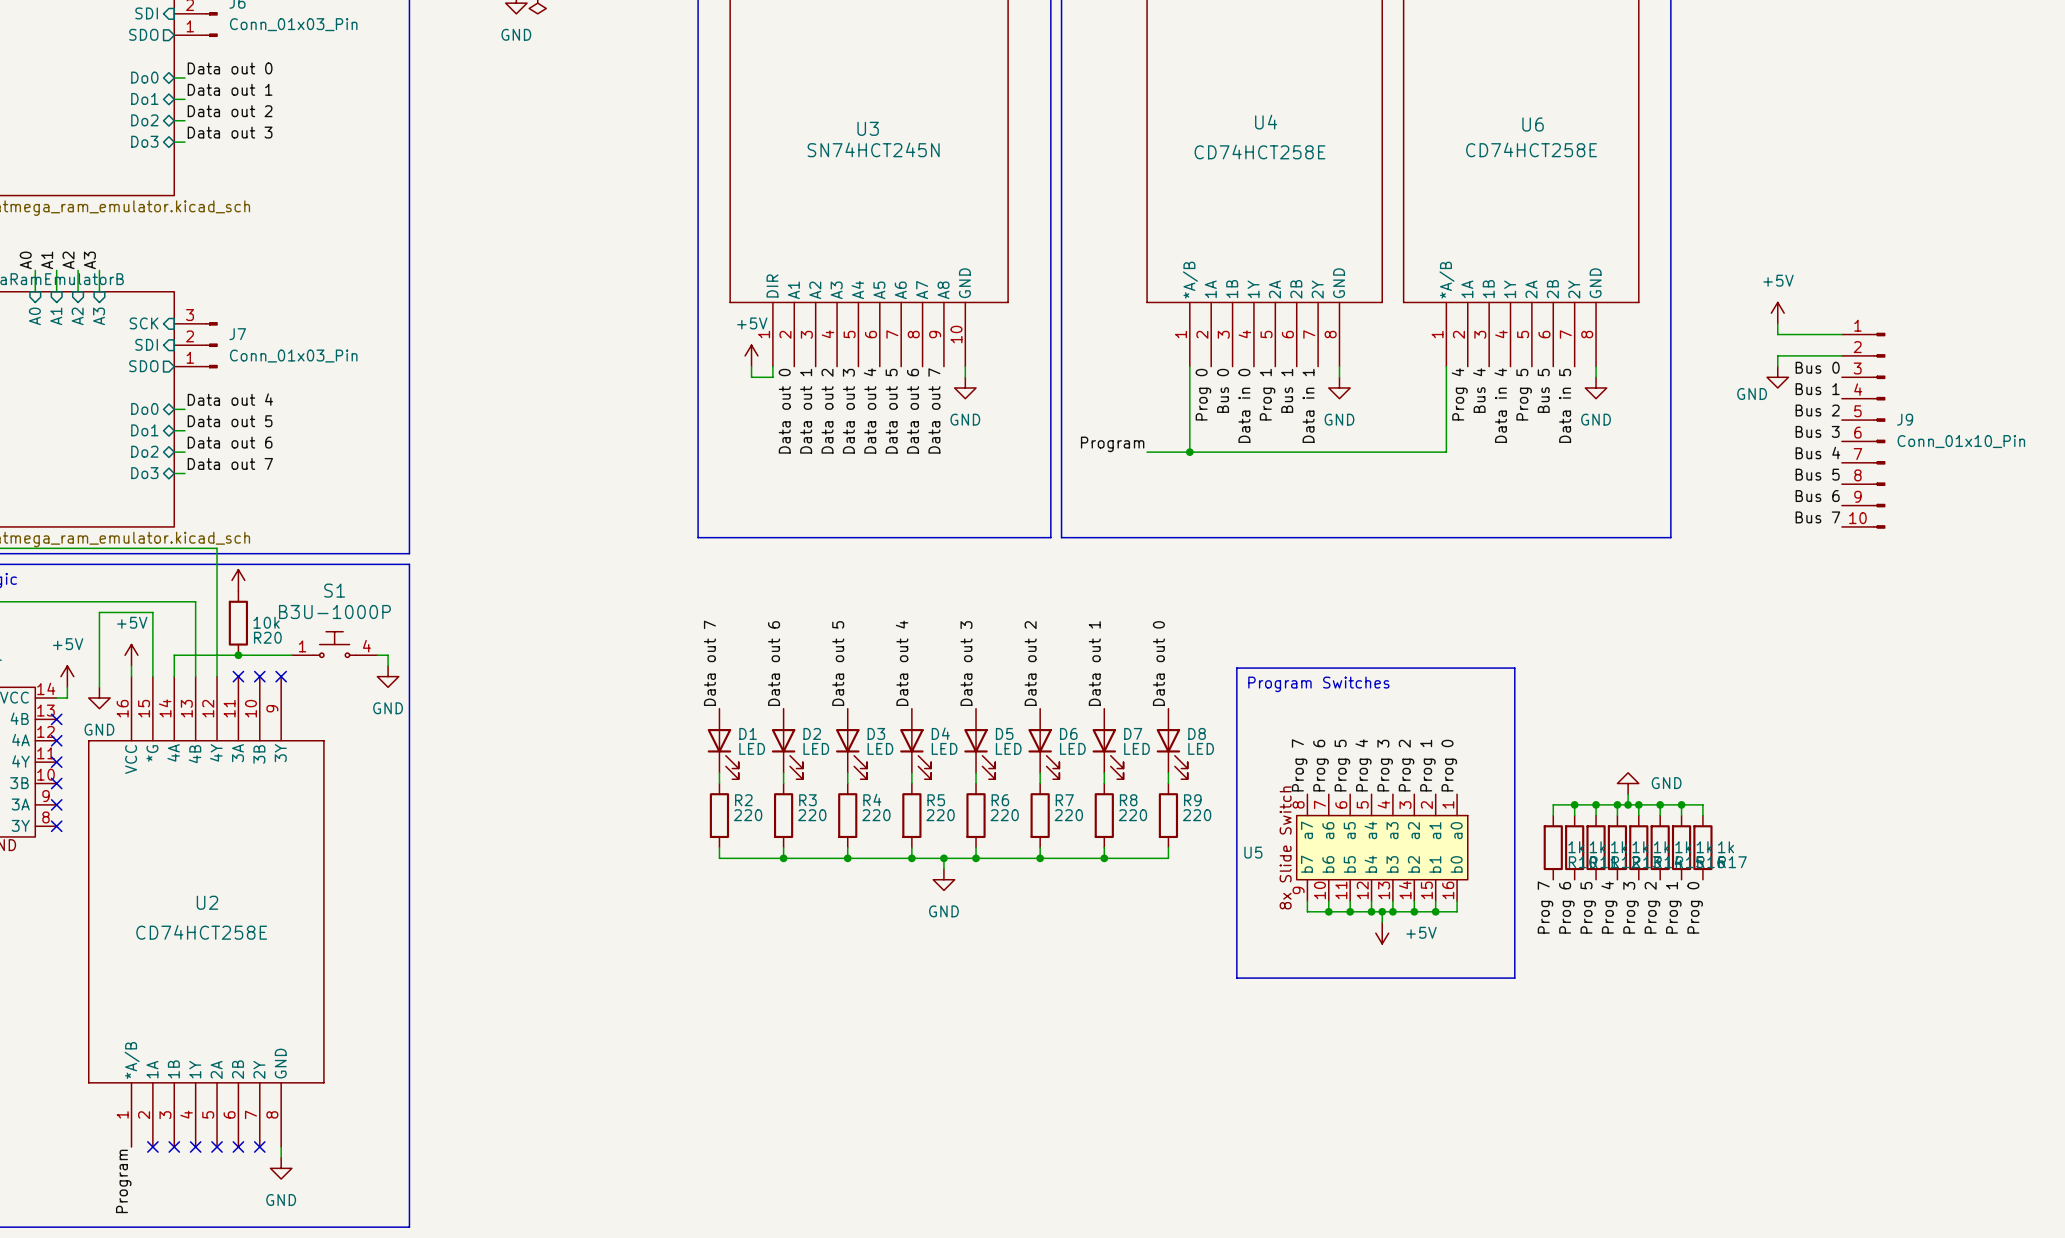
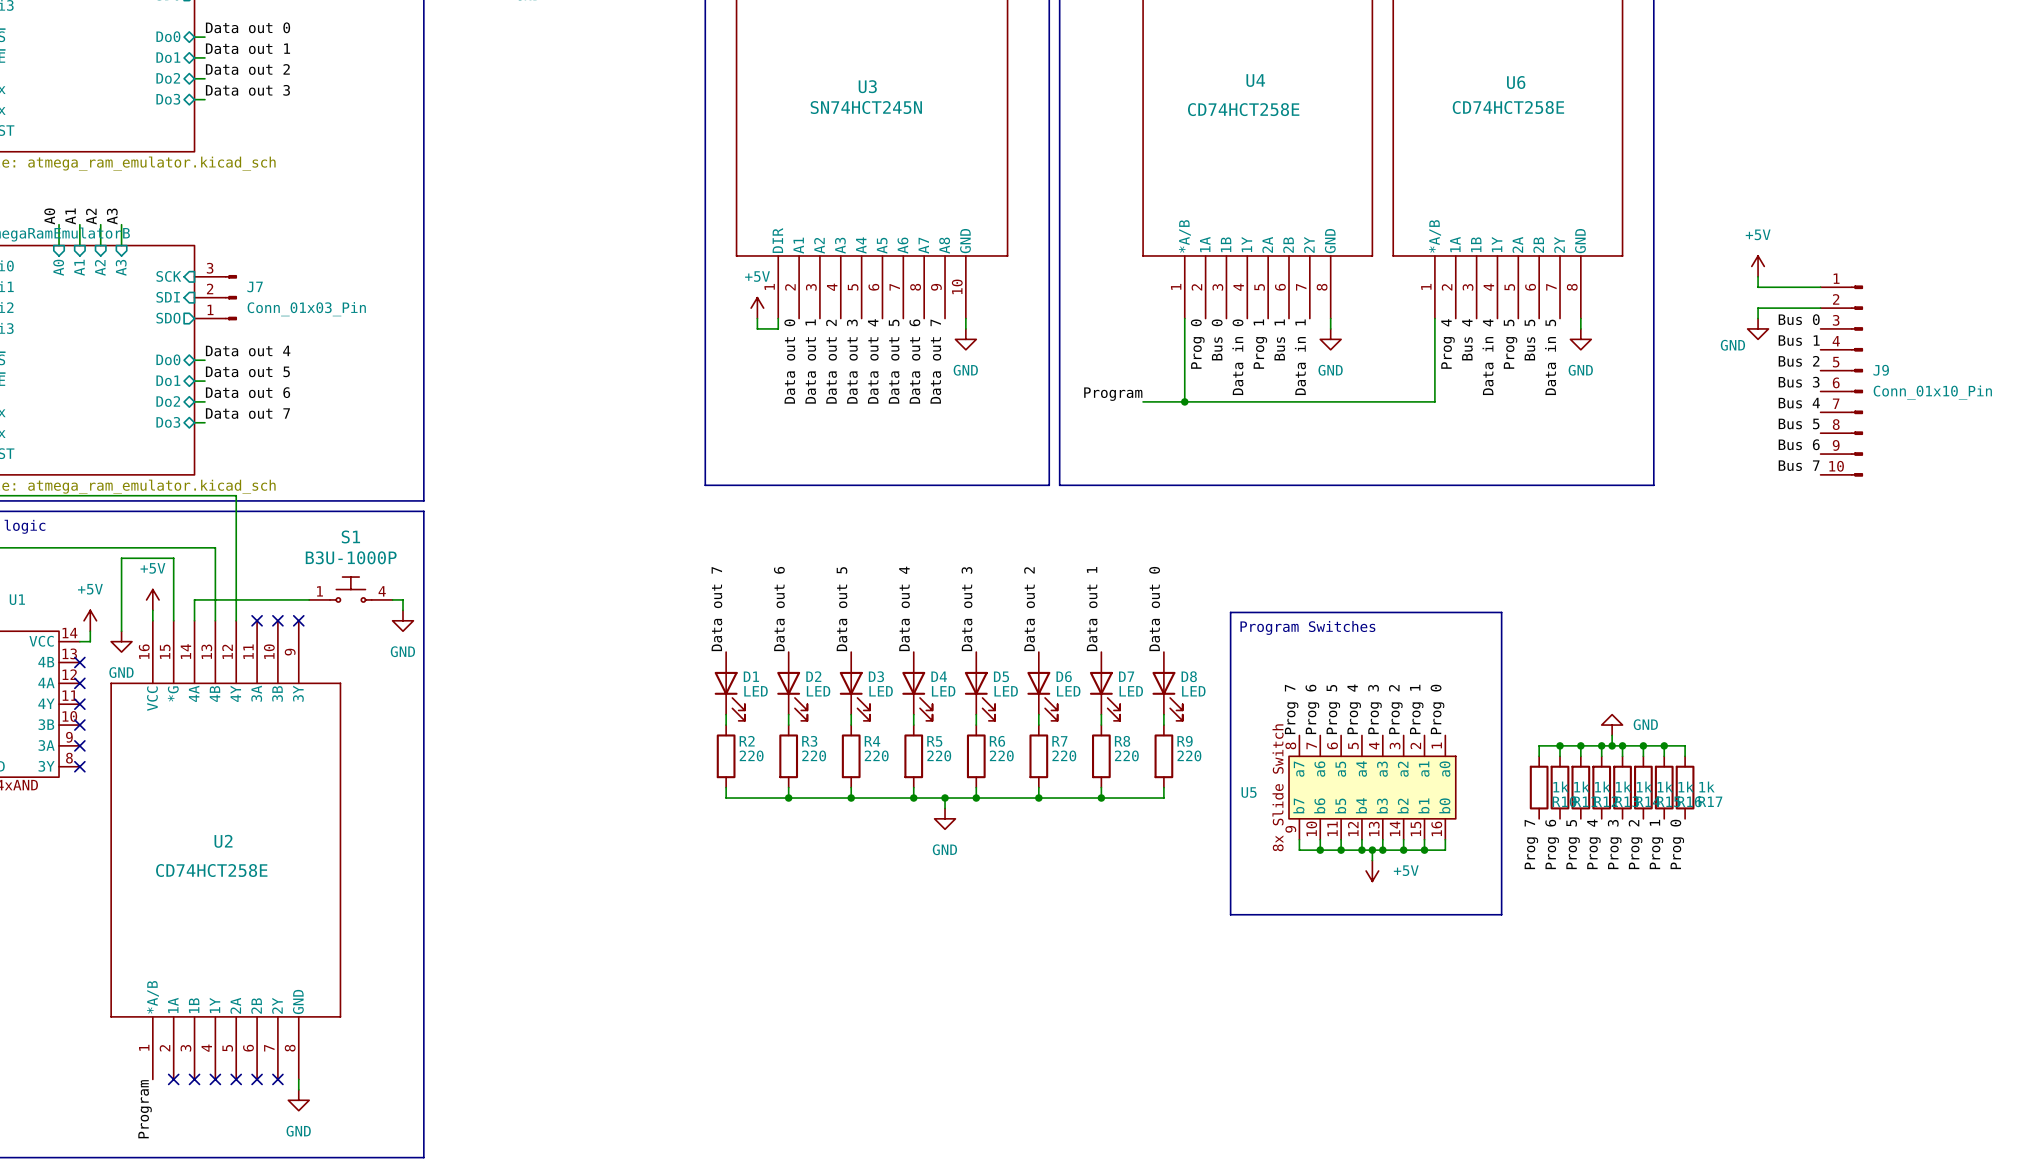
power symbol: (238, 580) -> none
R20: 10k (238, 623) -> none
junction: (238, 655) -> none

